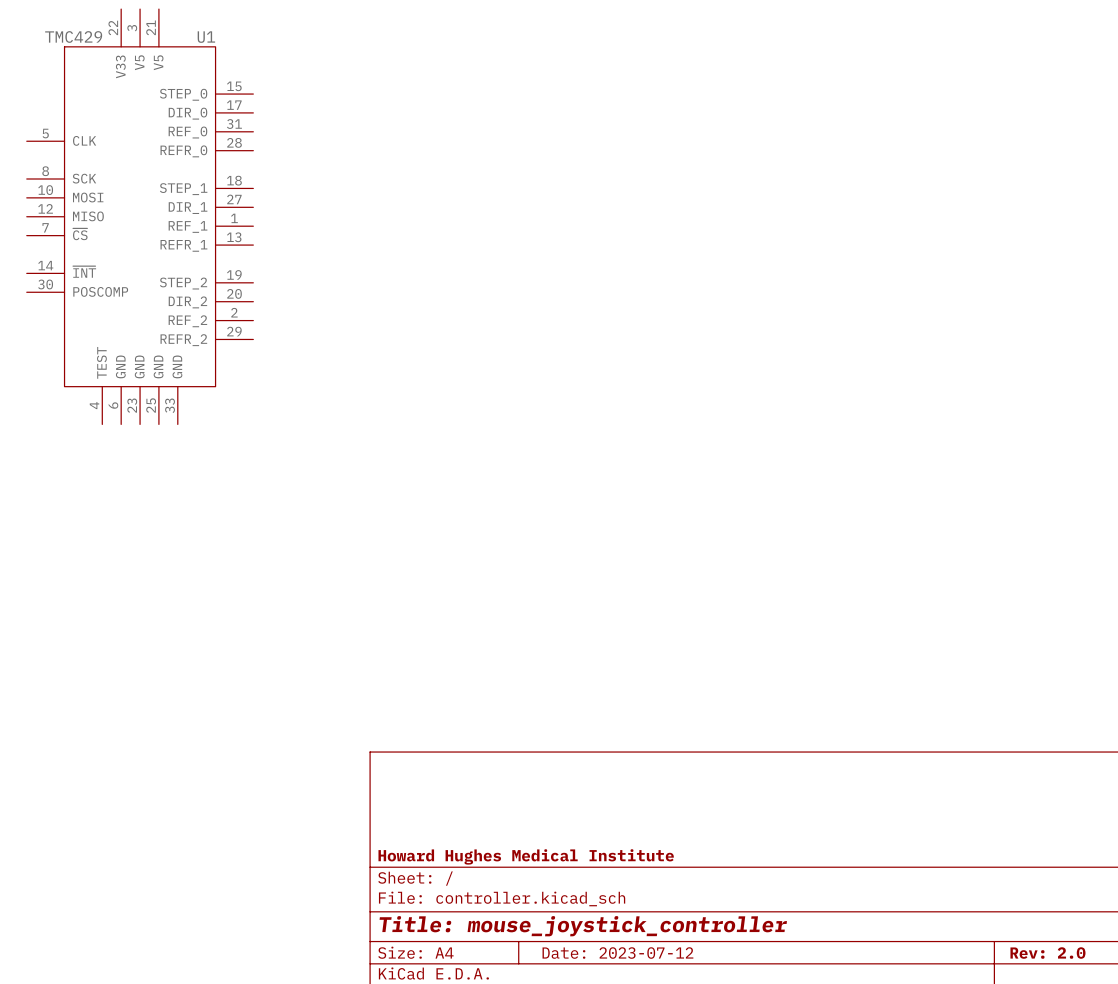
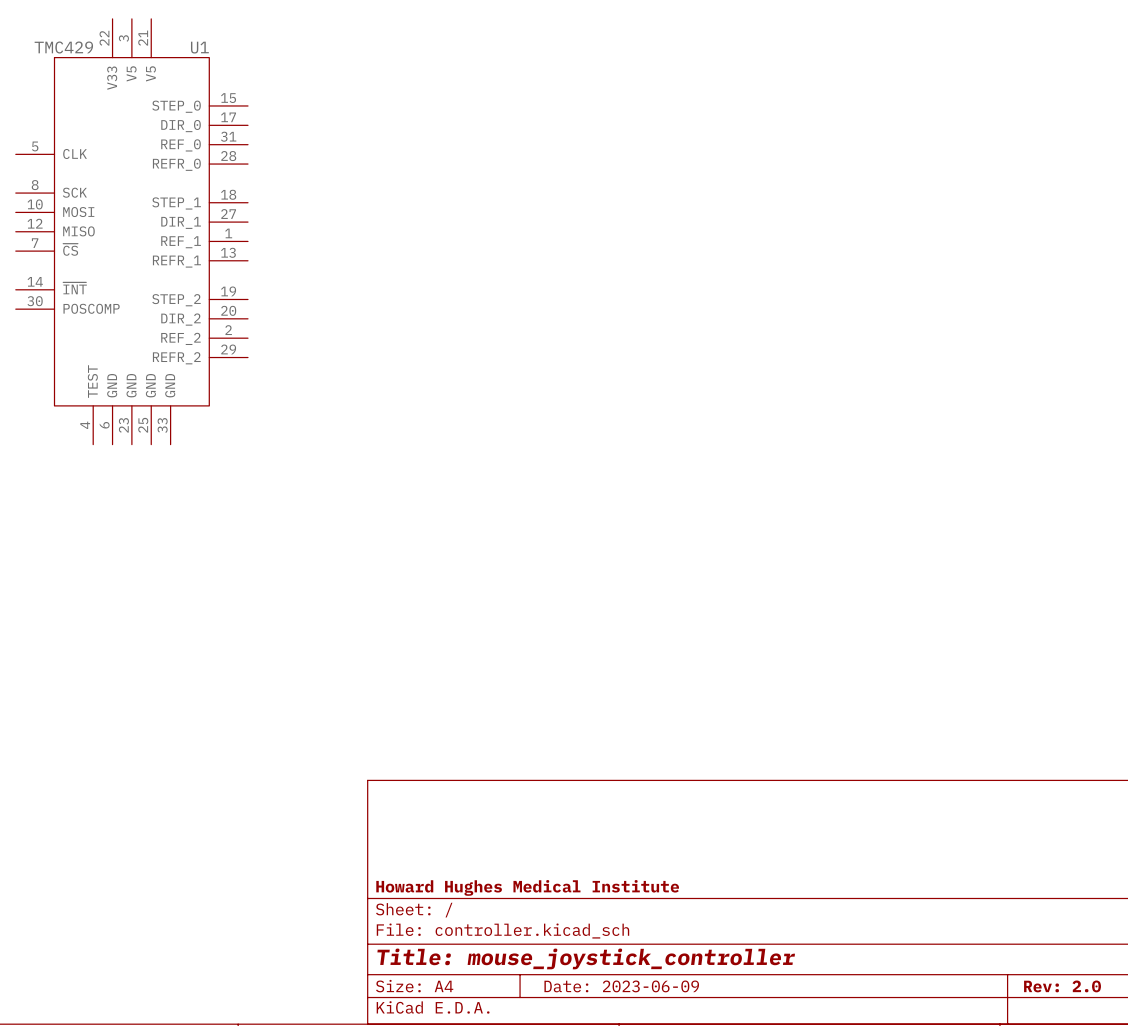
title block: Date: 2023-07-12 (617, 953) -> Date: 2023-06-09 (621, 986)

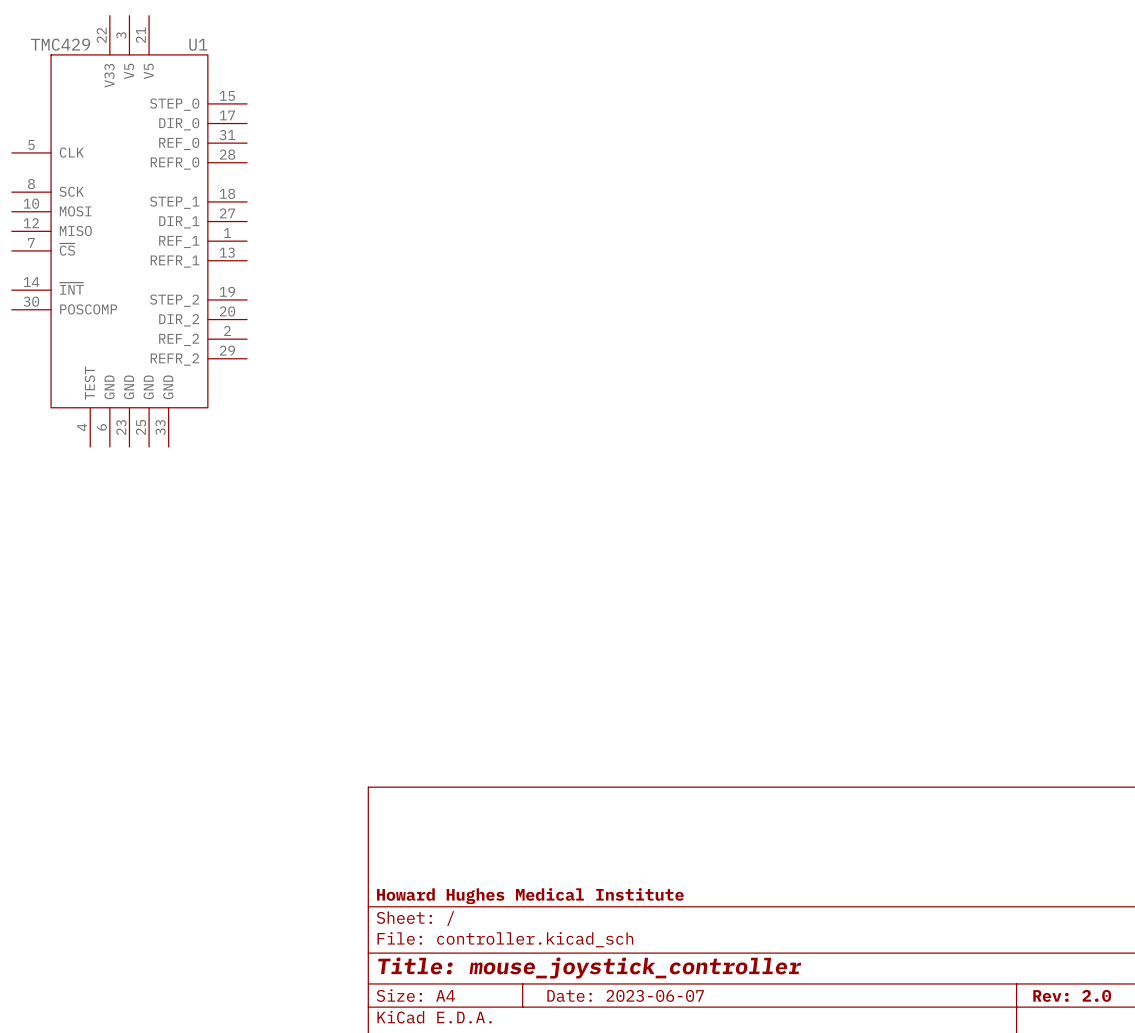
title block: Date: 2023-06-09 (621, 986) -> Date: 2023-06-07 (625, 995)

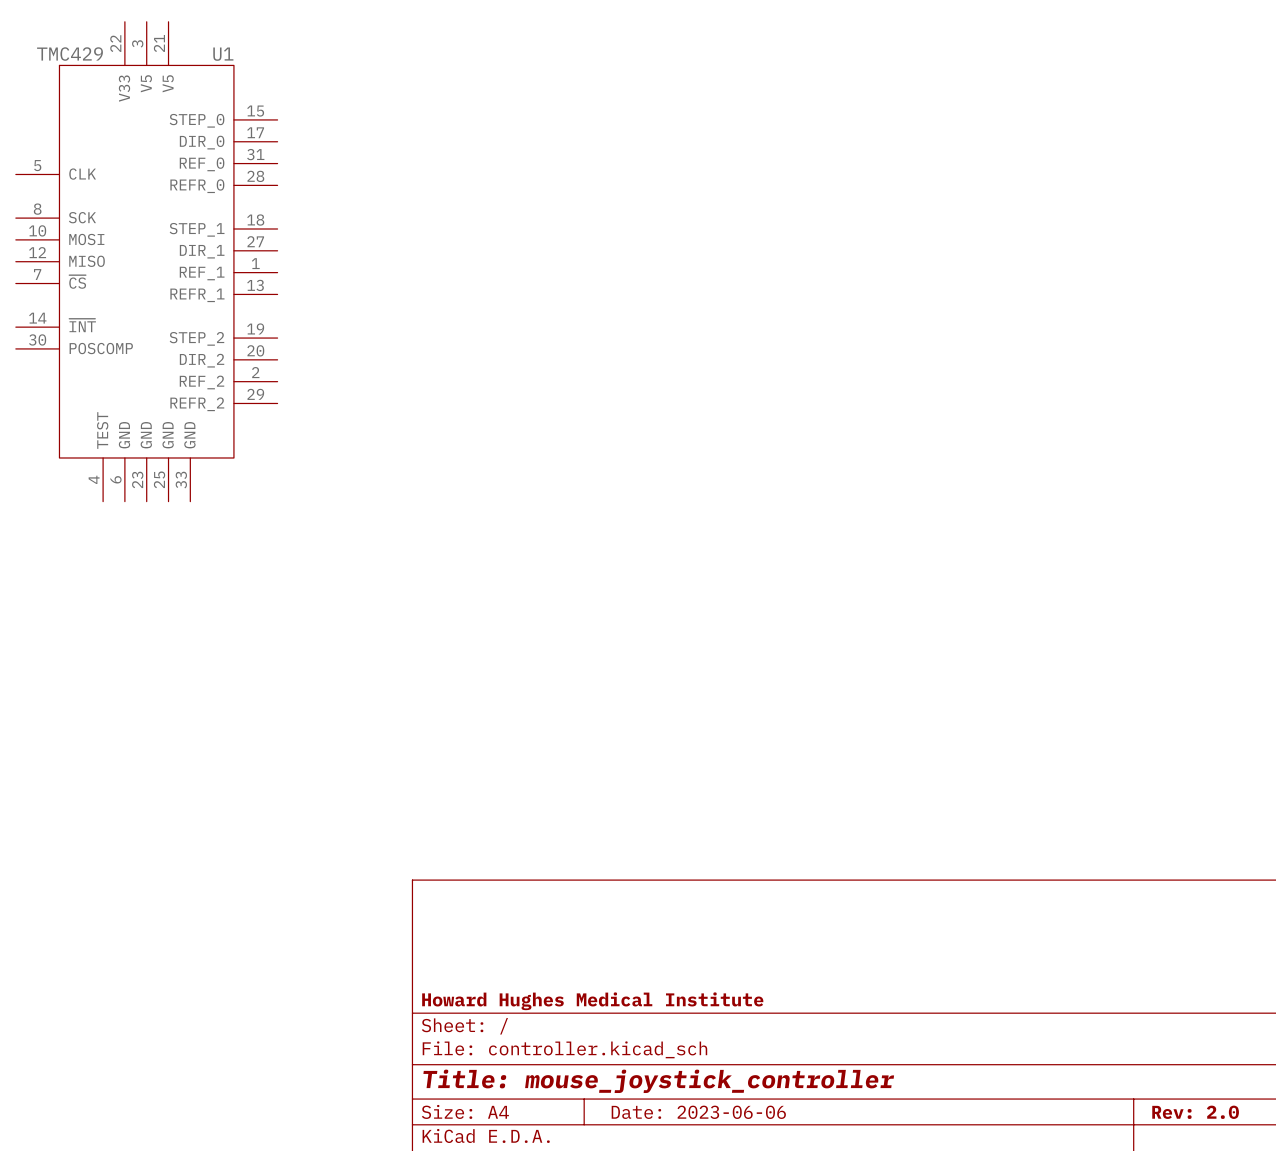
title block: Date: 2023-06-07 (625, 995) -> Date: 2023-06-06 (698, 1112)

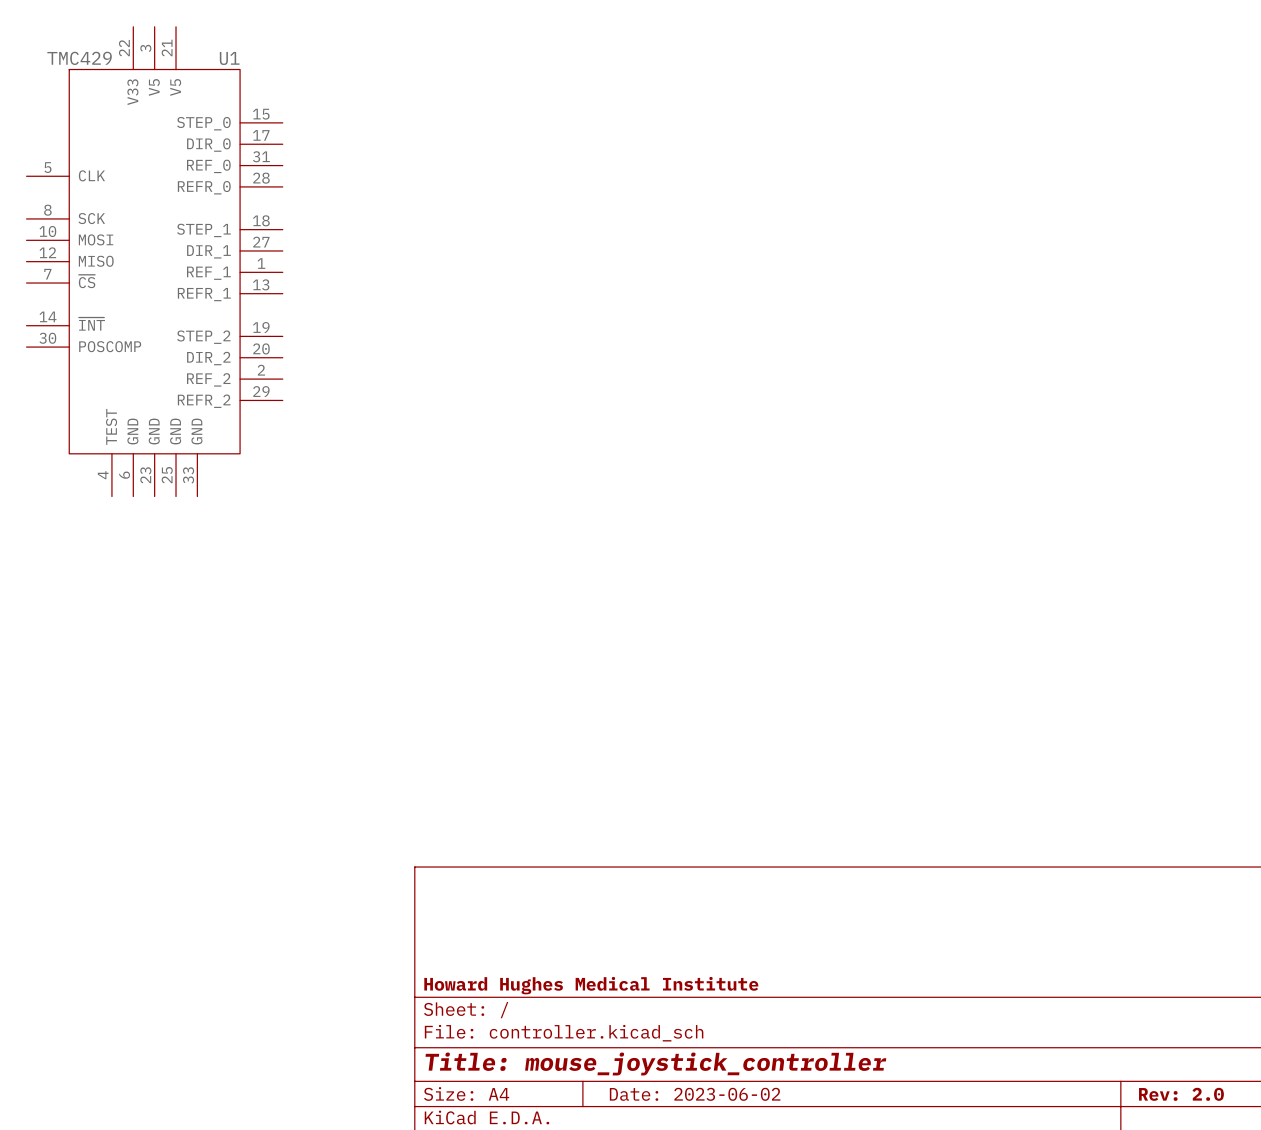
title block: Date: 2023-06-06 (698, 1112) -> Date: 2023-06-02 (695, 1094)

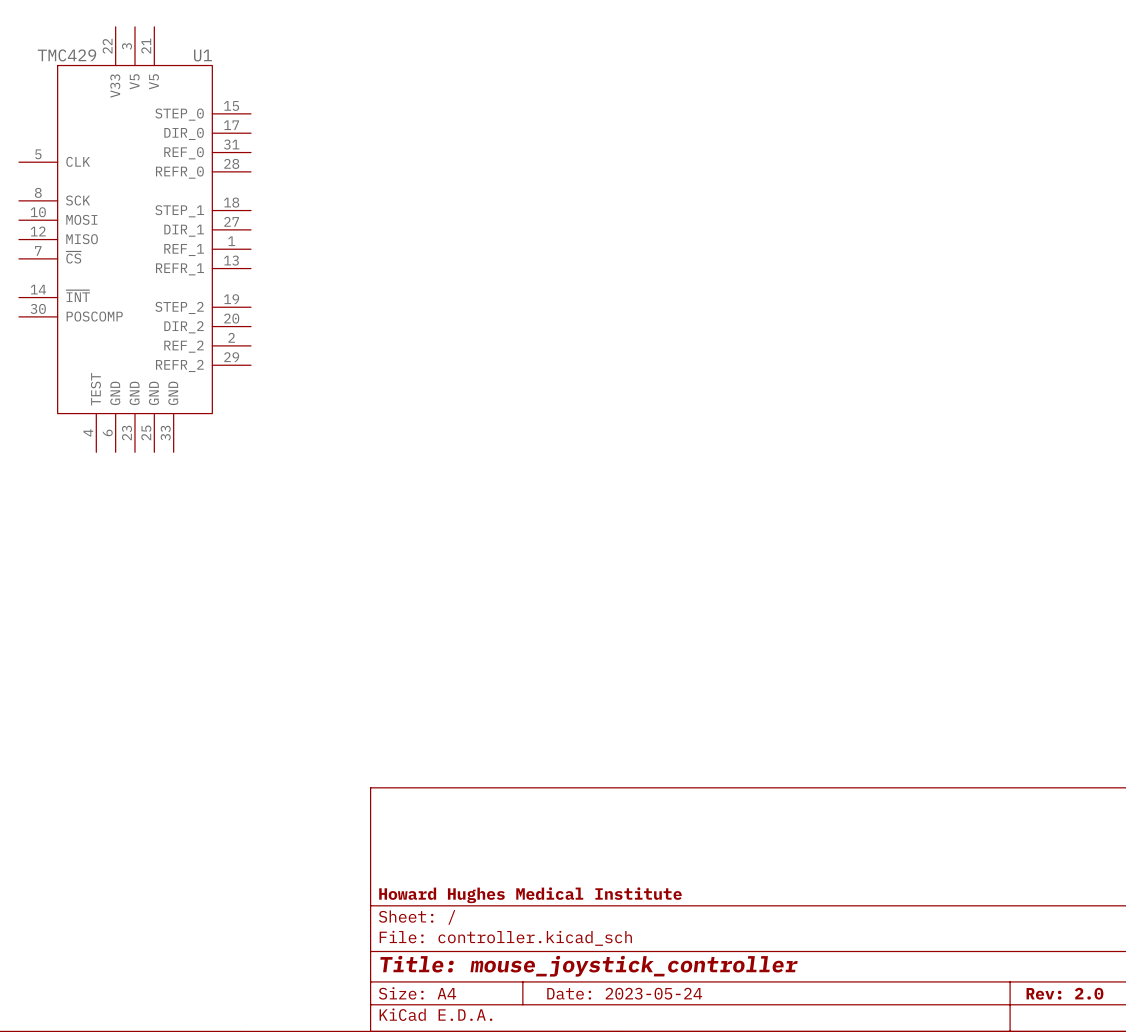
title block: Date: 2023-06-02 (695, 1094) -> Date: 2023-05-24 (624, 993)

